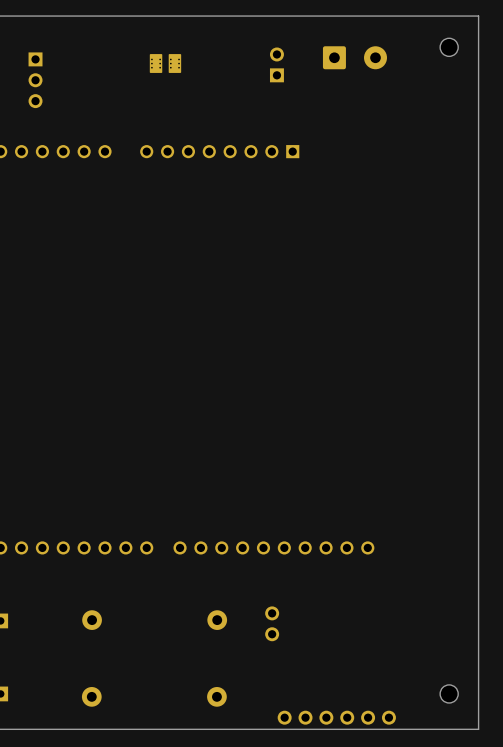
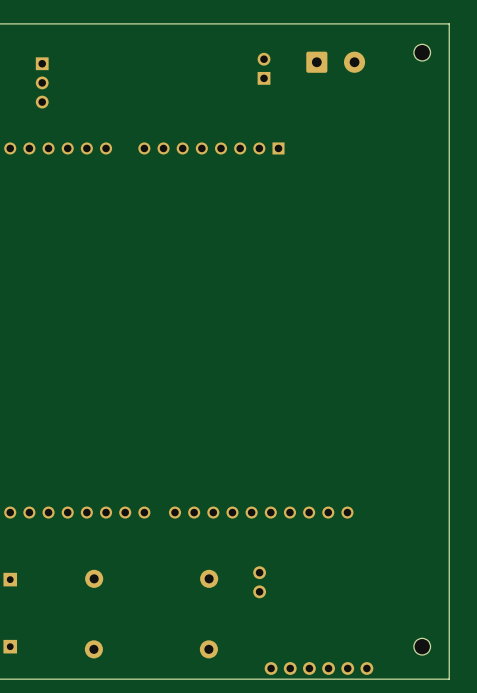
part: (165, 63) -> none

